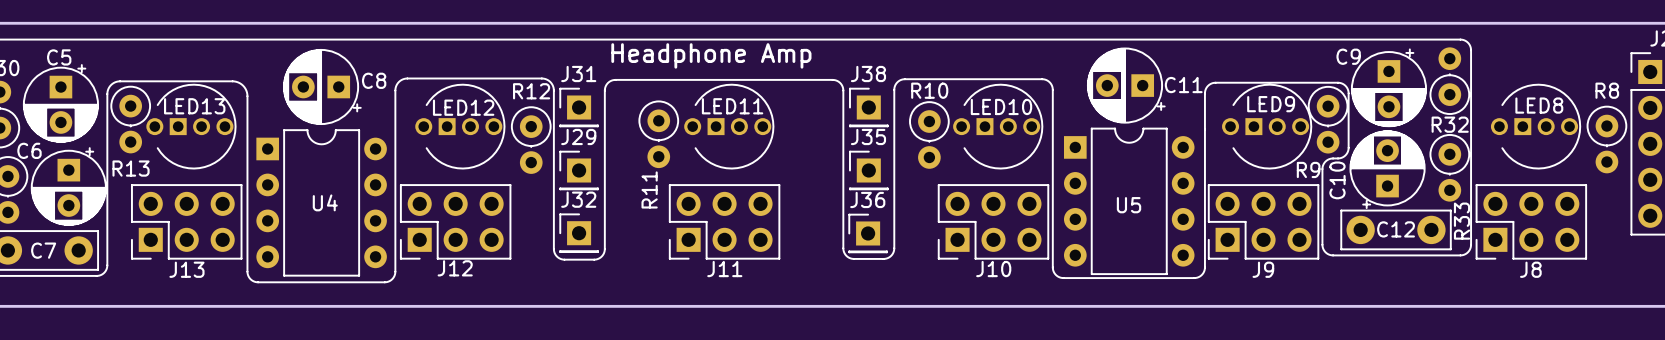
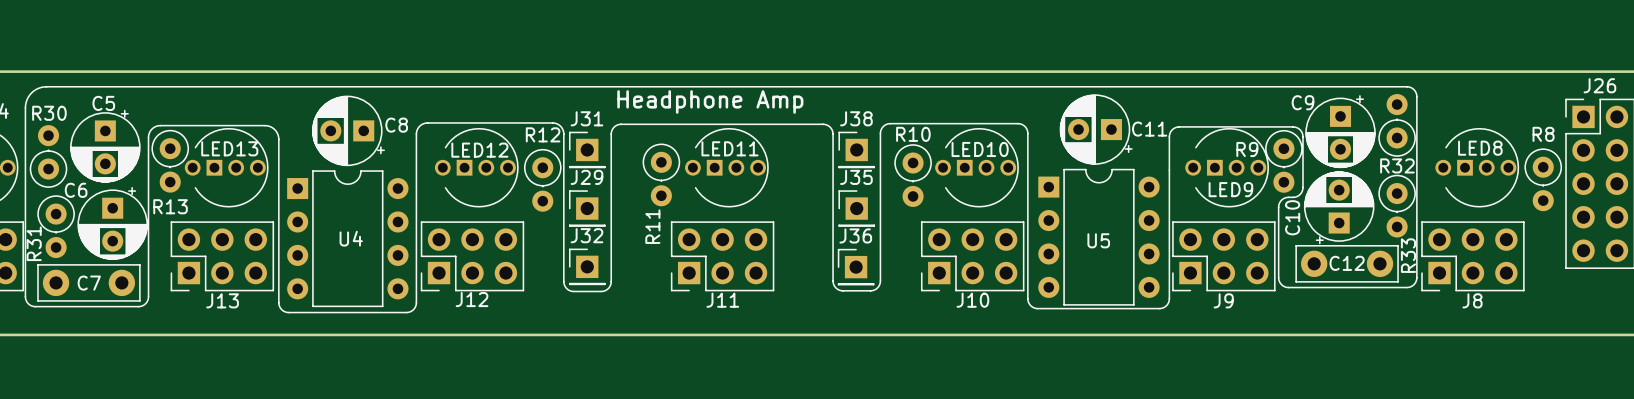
LED9 name position: LED9 (1271, 104) -> LED9 (1230, 189)
R9 name position: R9 (1308, 169) -> R9 (1247, 149)

